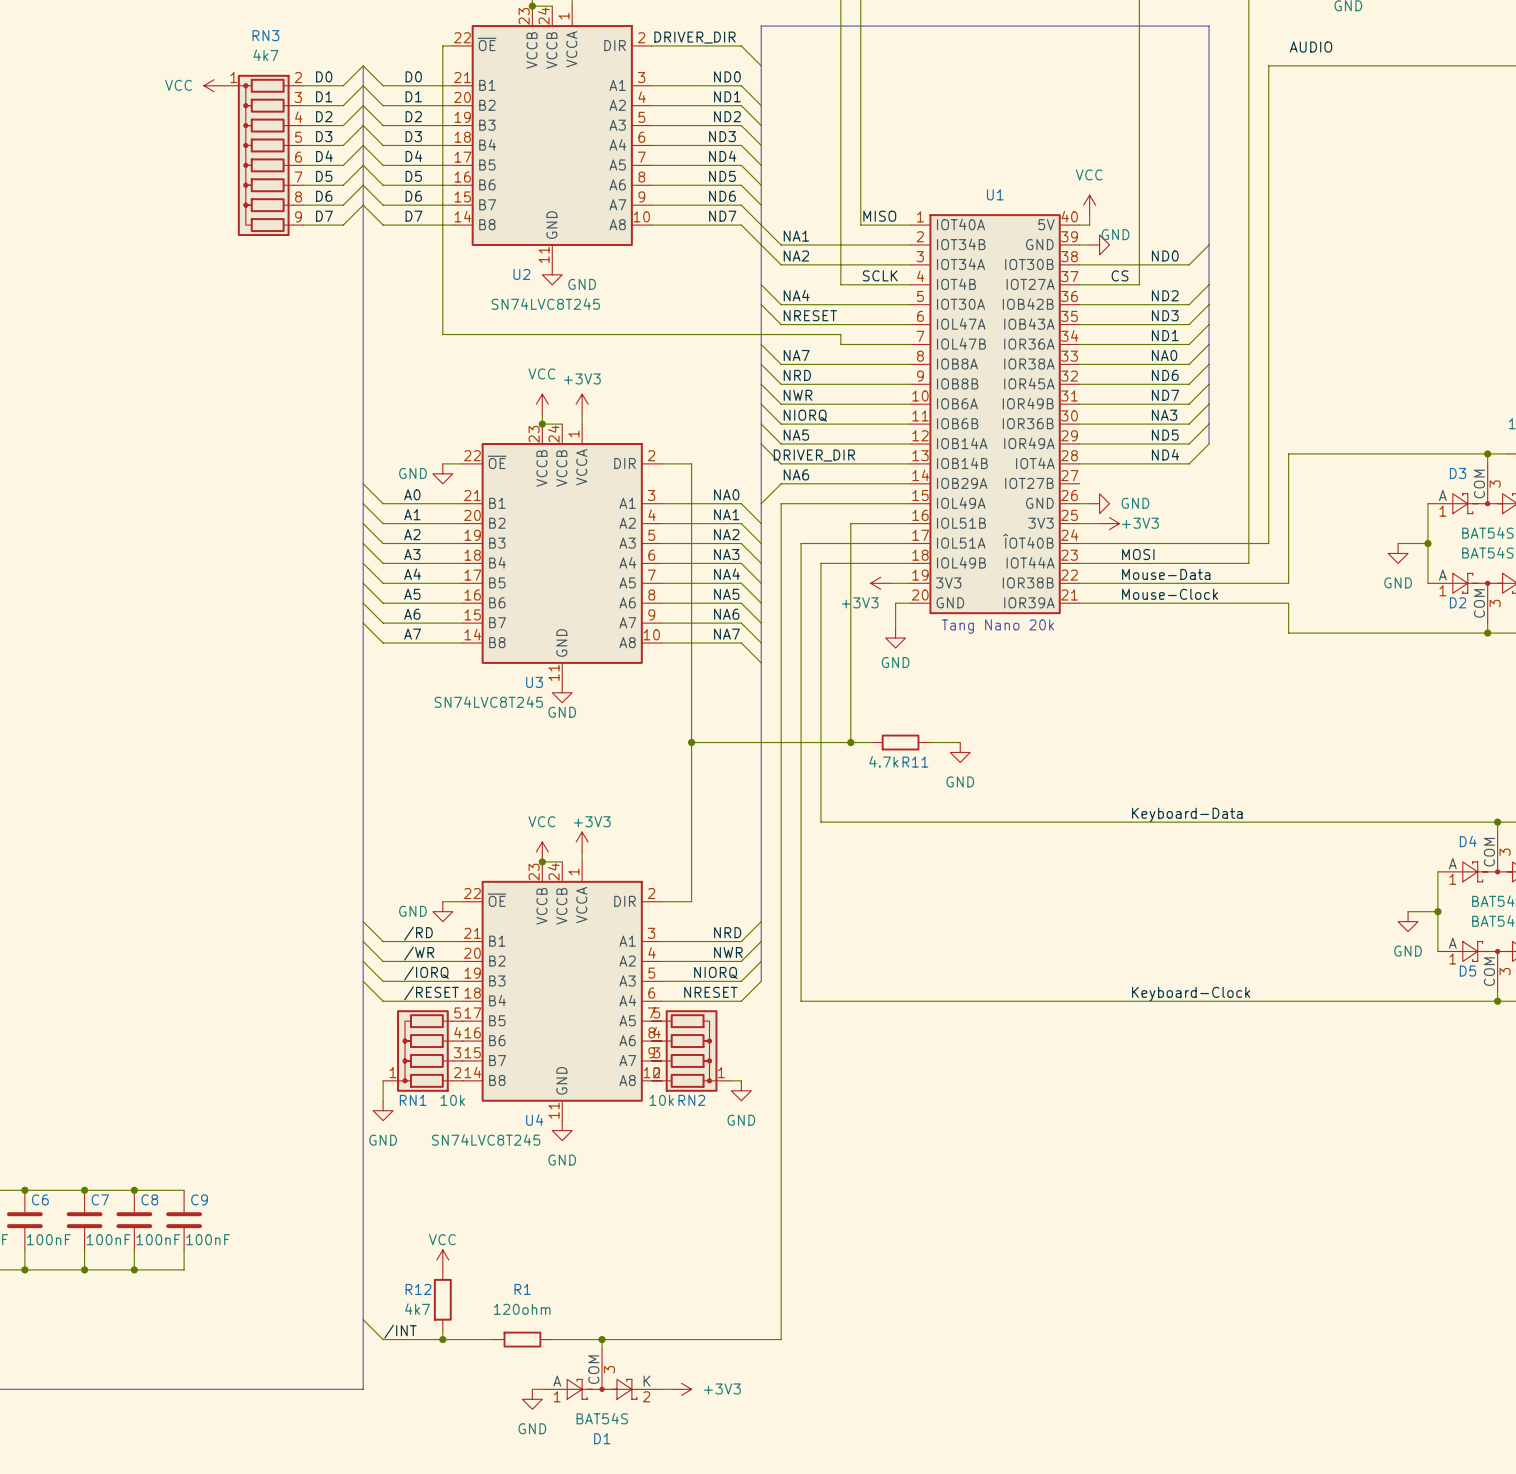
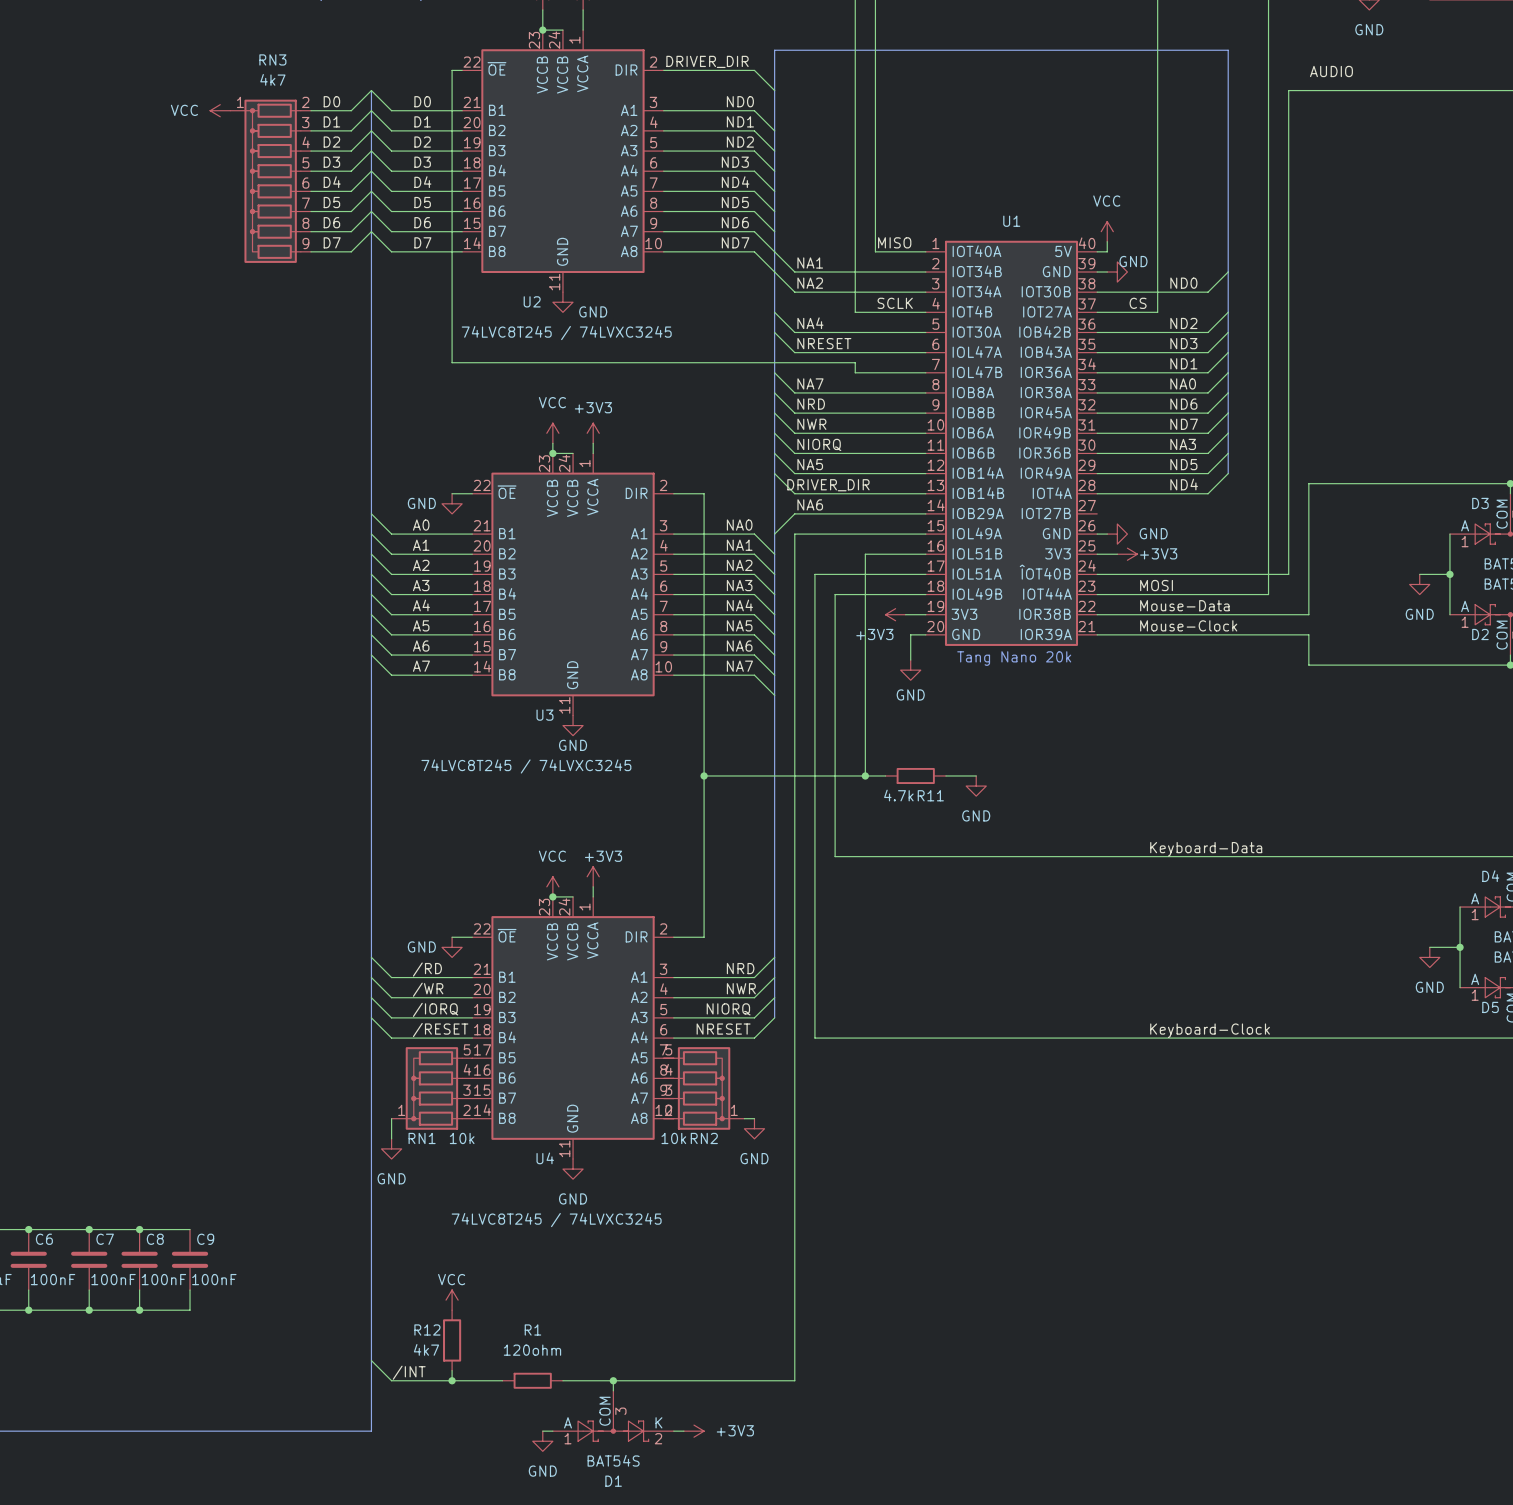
U2 value: SN74LVC8T245 (545, 304) -> 74LVC8T245 / 74LVXC3245 (566, 333)
U3 value: SN74LVC8T245 (488, 702) -> 74LVC8T245 / 74LVXC3245 (526, 766)
U4 value: SN74LVC8T245 (486, 1139) -> 74LVC8T245 / 74LVXC3245 (556, 1220)

